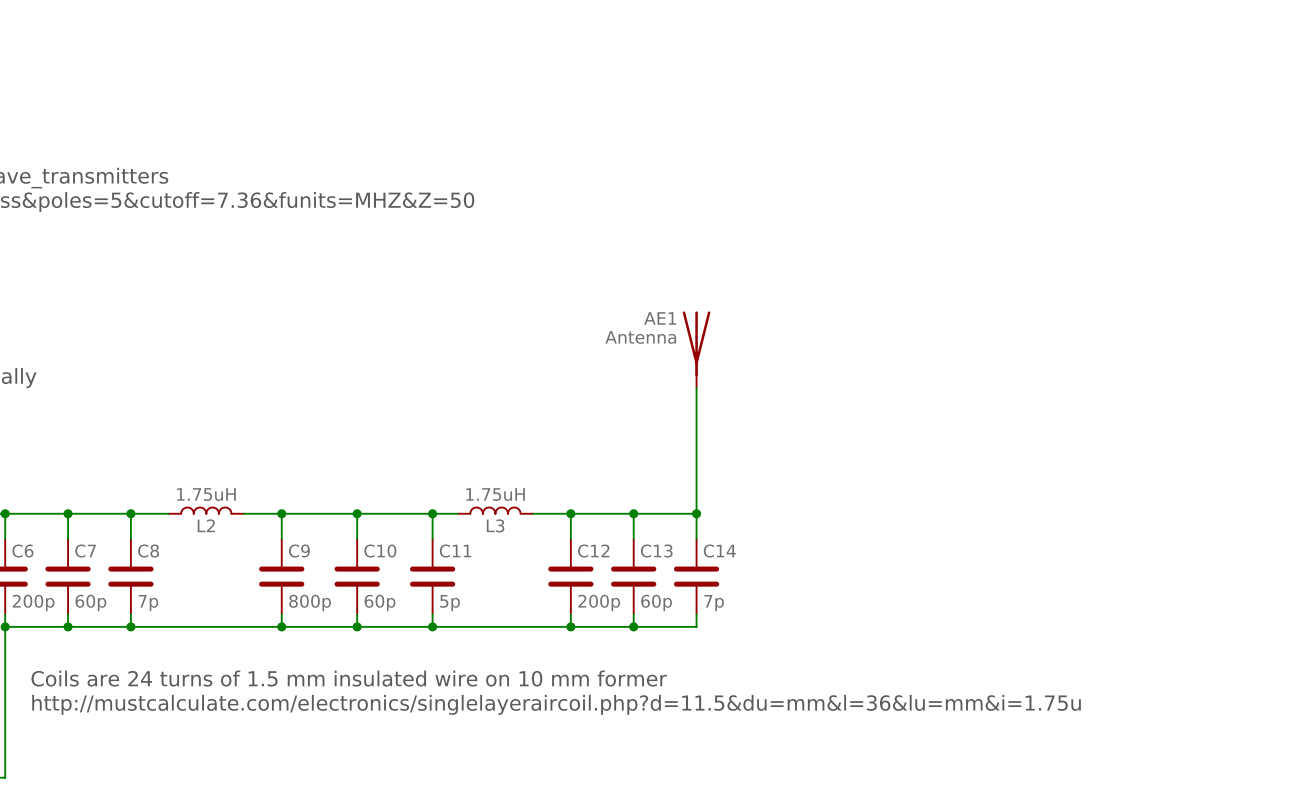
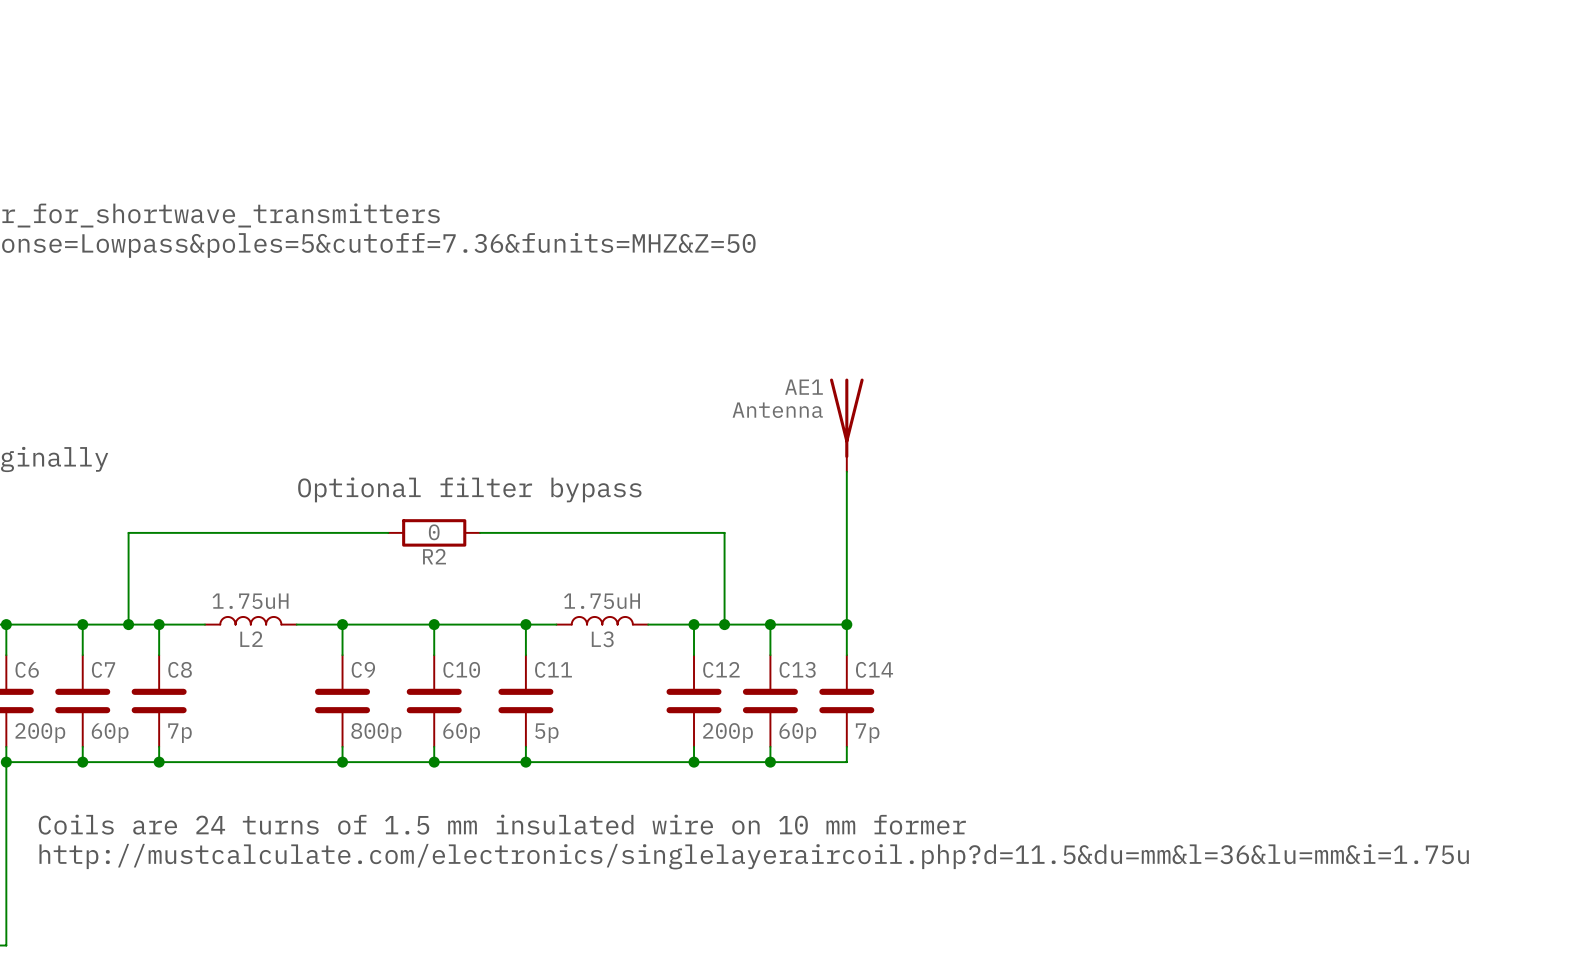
text: none -> Optional filter bypass (469, 489)
wire: none -> (388, 532) (128, 532) (128, 624)
R2: none -> 0 (434, 532)
wire: none -> (480, 532) (724, 532) (724, 624)
junction: none -> (128, 624)
junction: none -> (724, 624)

